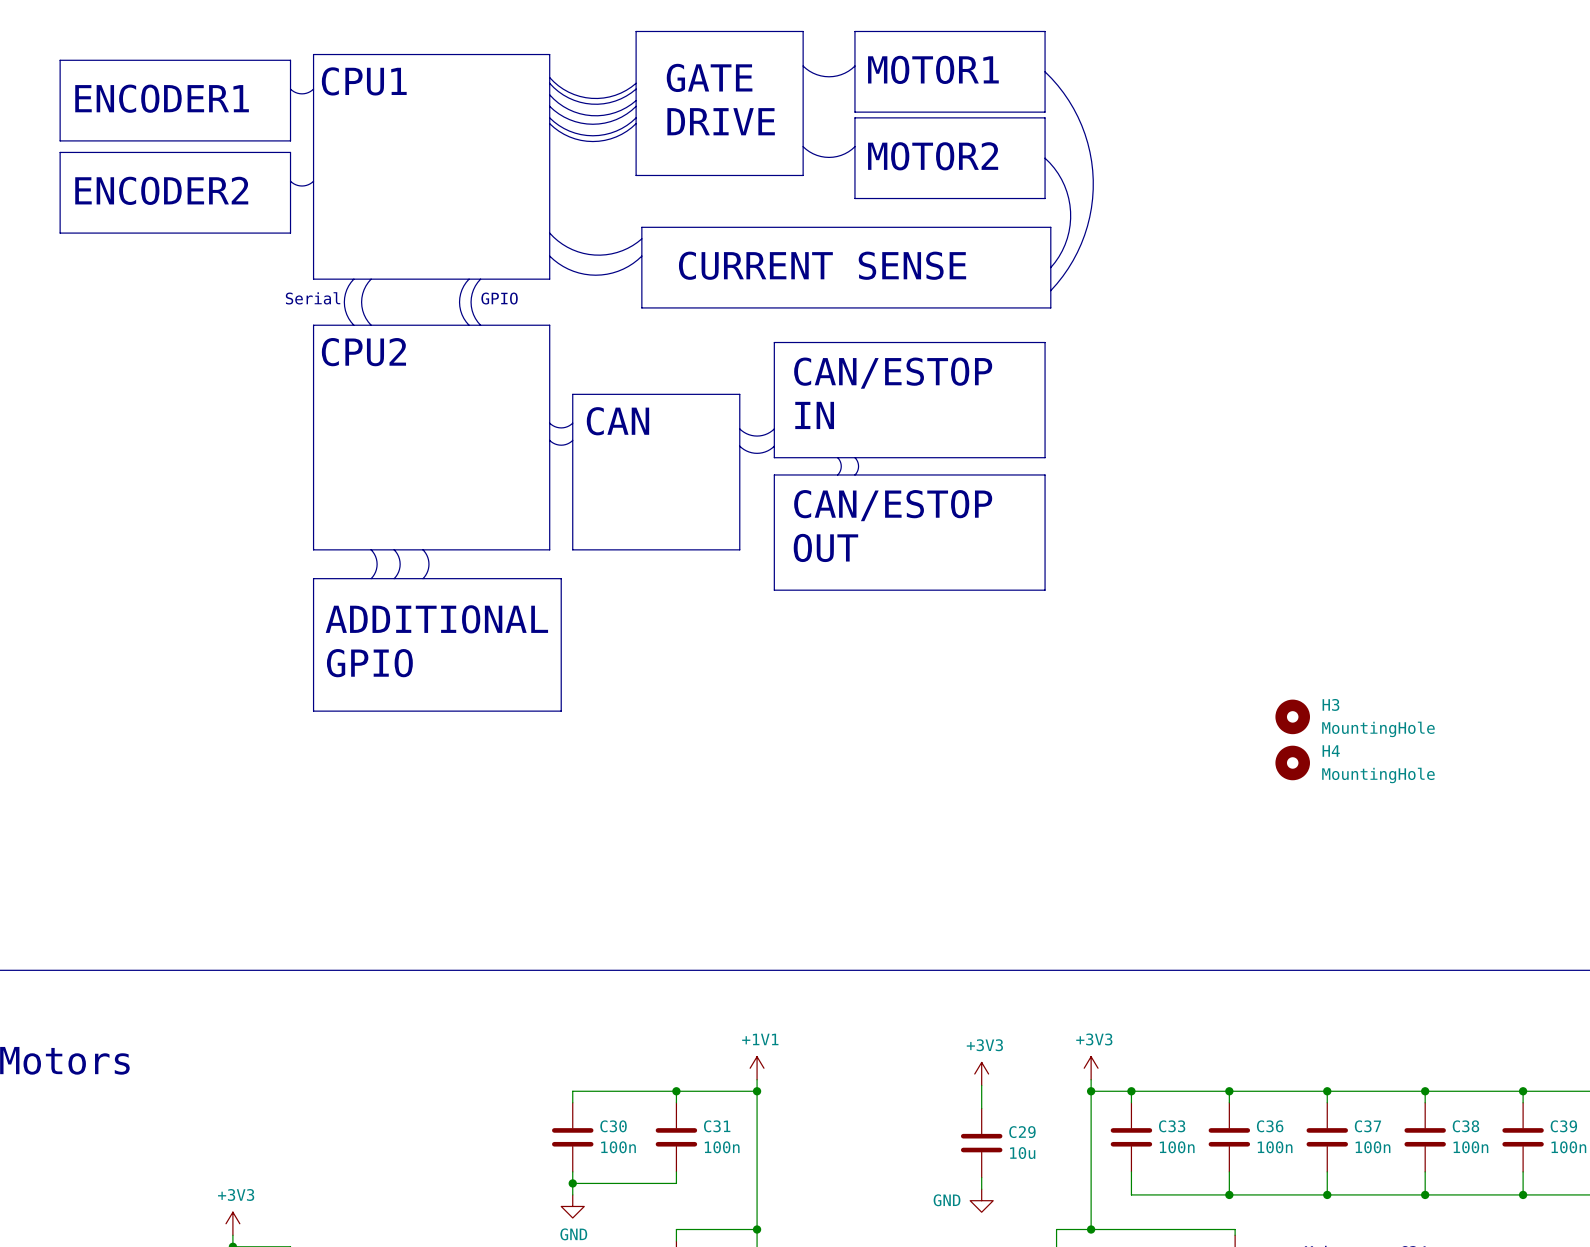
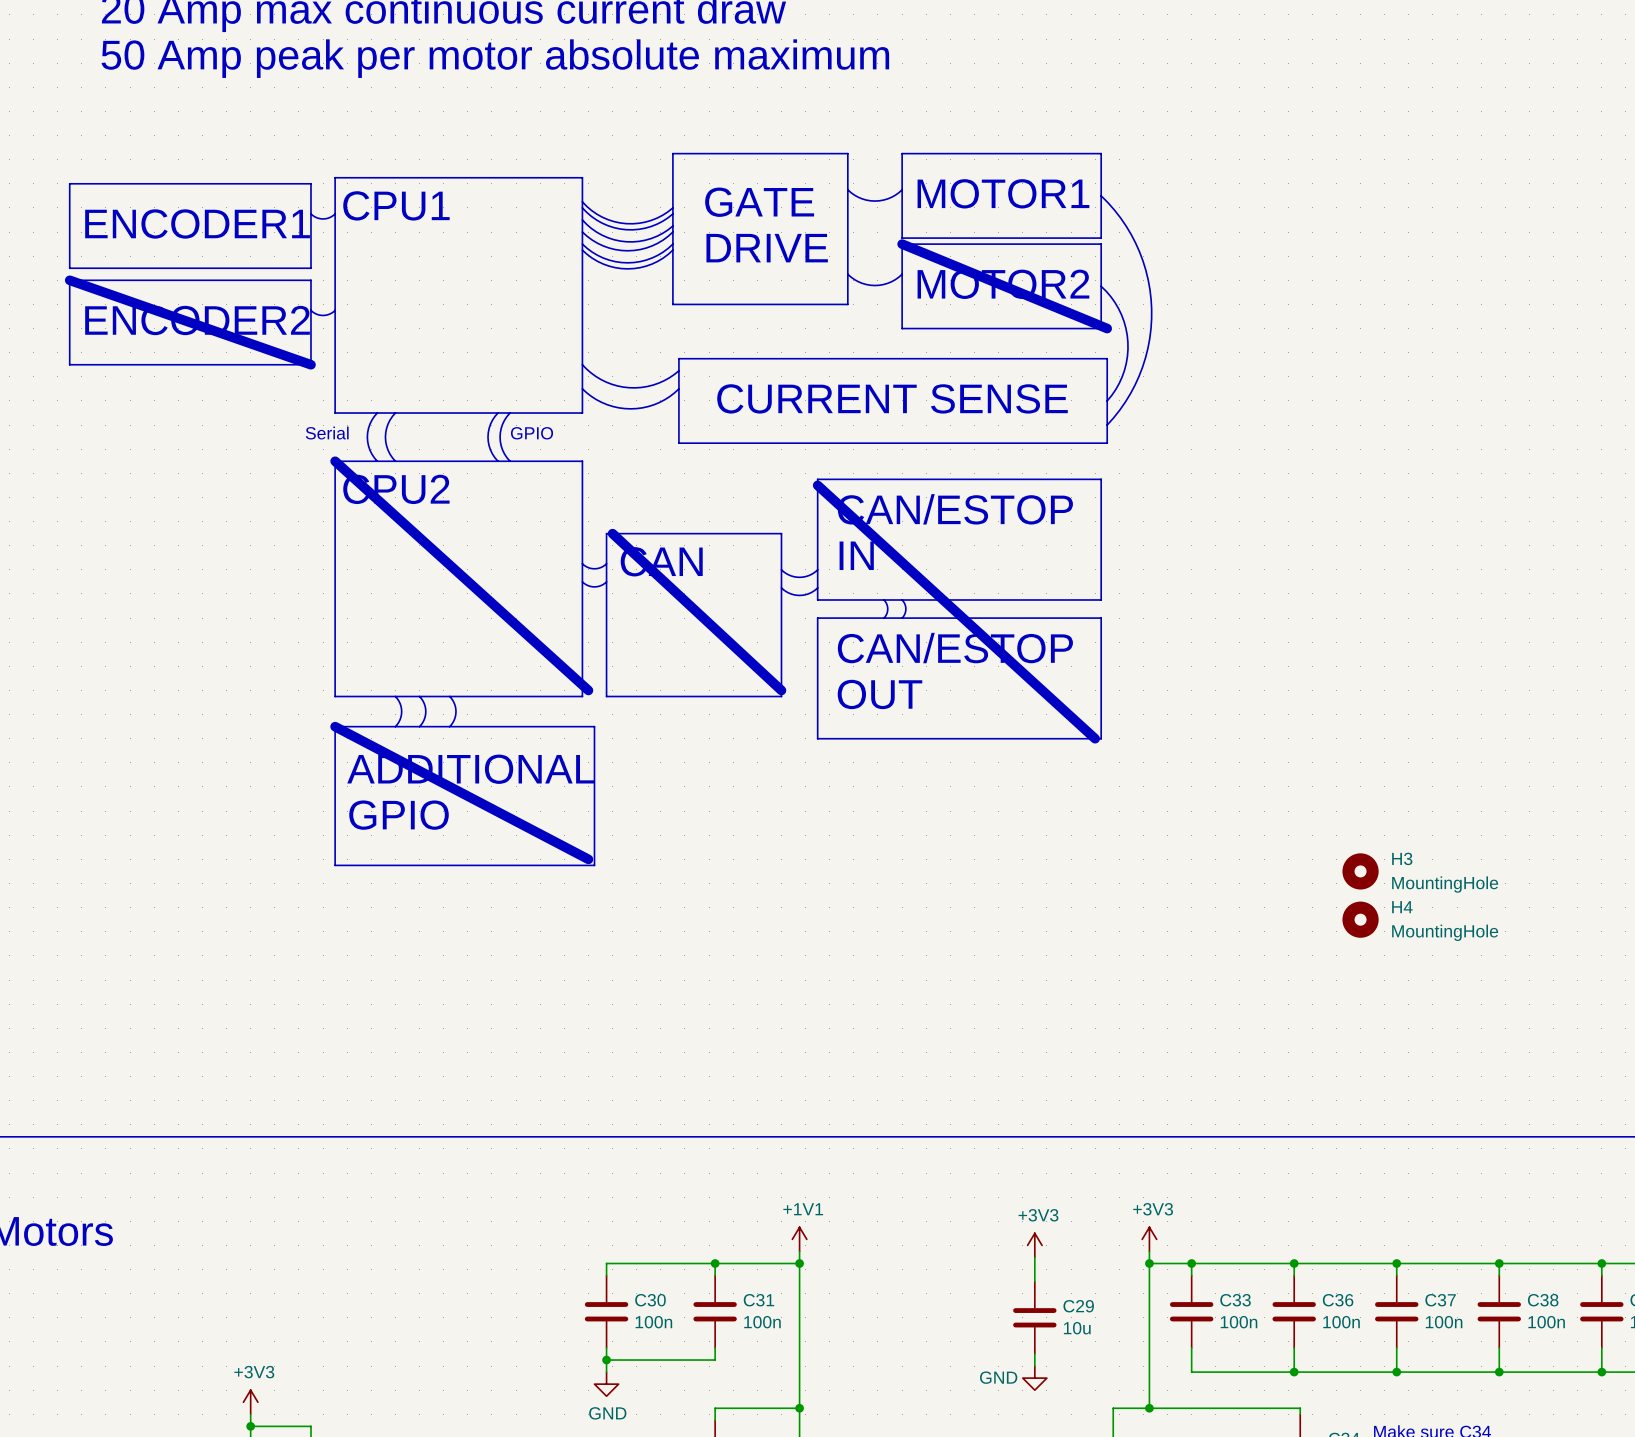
line: none -> (902, 244) (1107, 328)
line: none -> (69, 280) (310, 364)
line: none -> (335, 461) (588, 690)
line: none -> (817, 485) (1095, 738)
line: none -> (612, 533) (781, 690)
line: none -> (335, 726) (588, 859)

